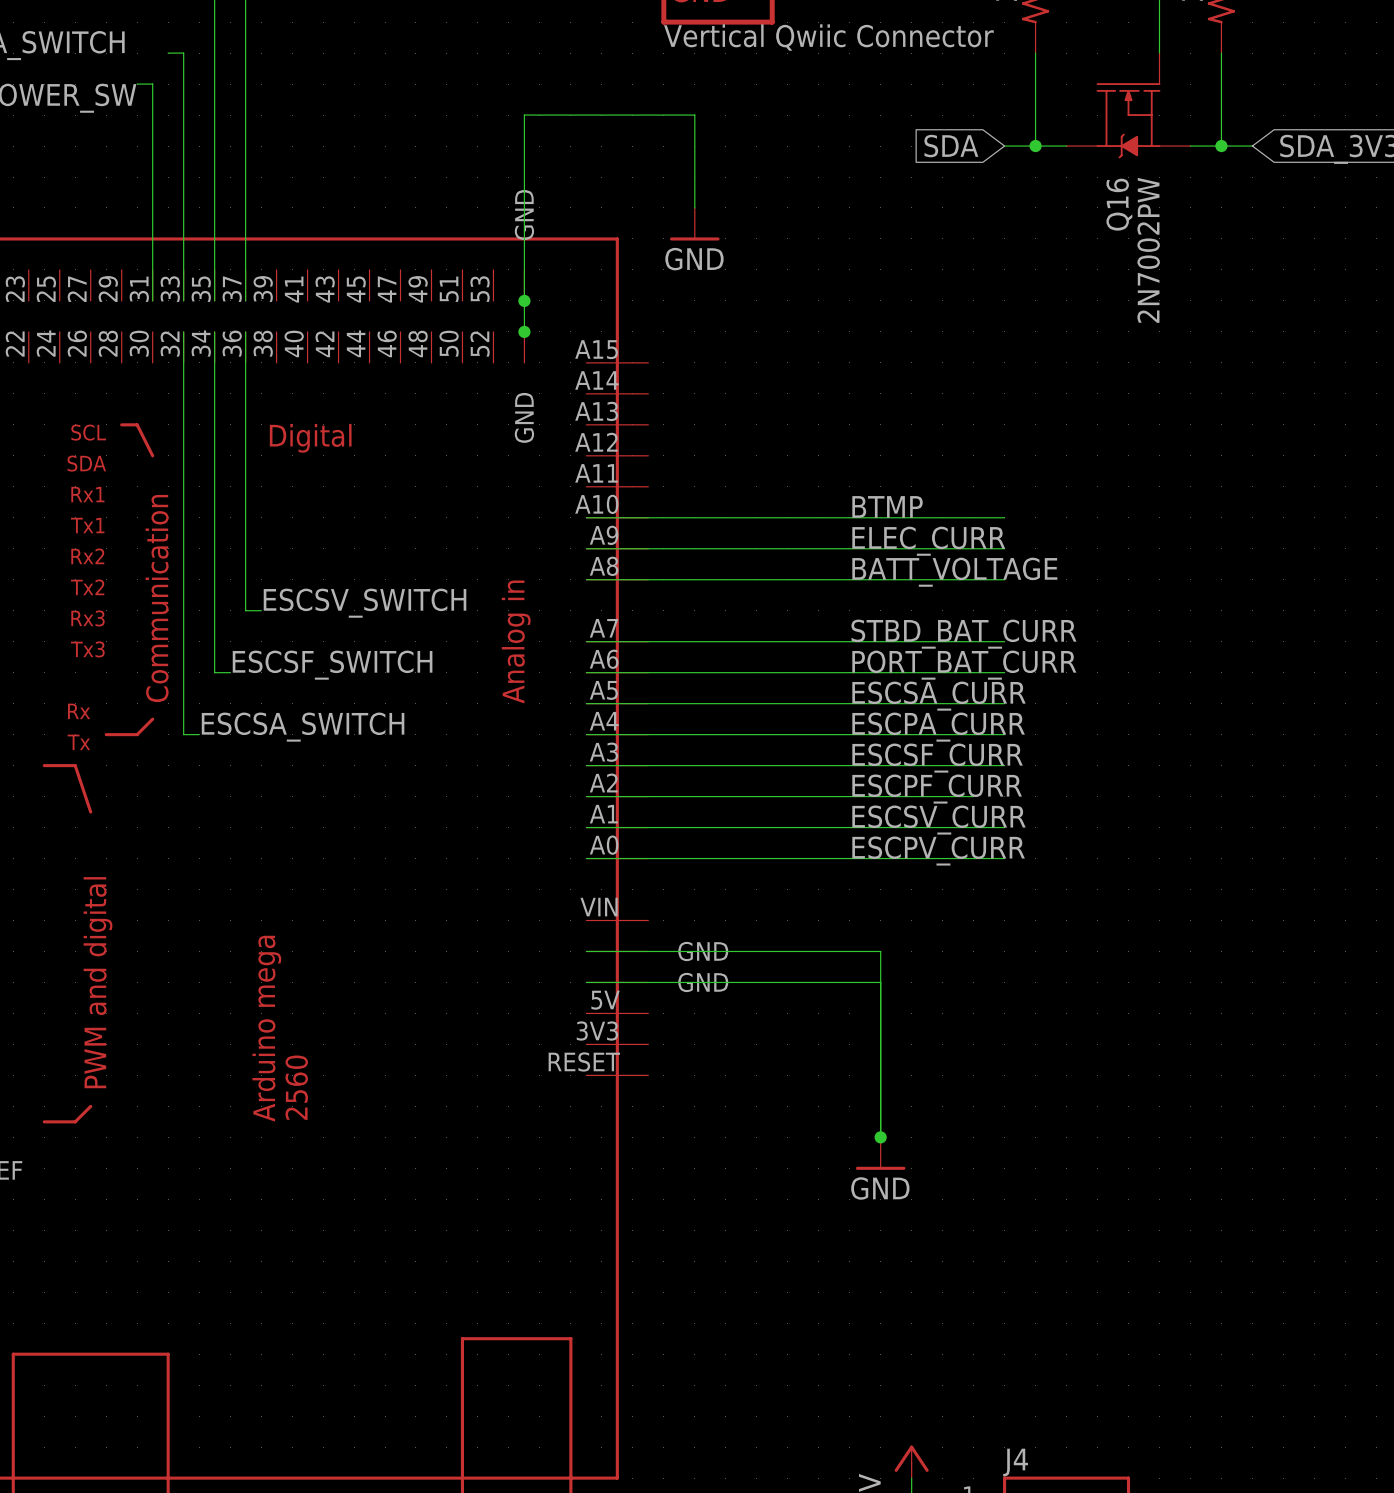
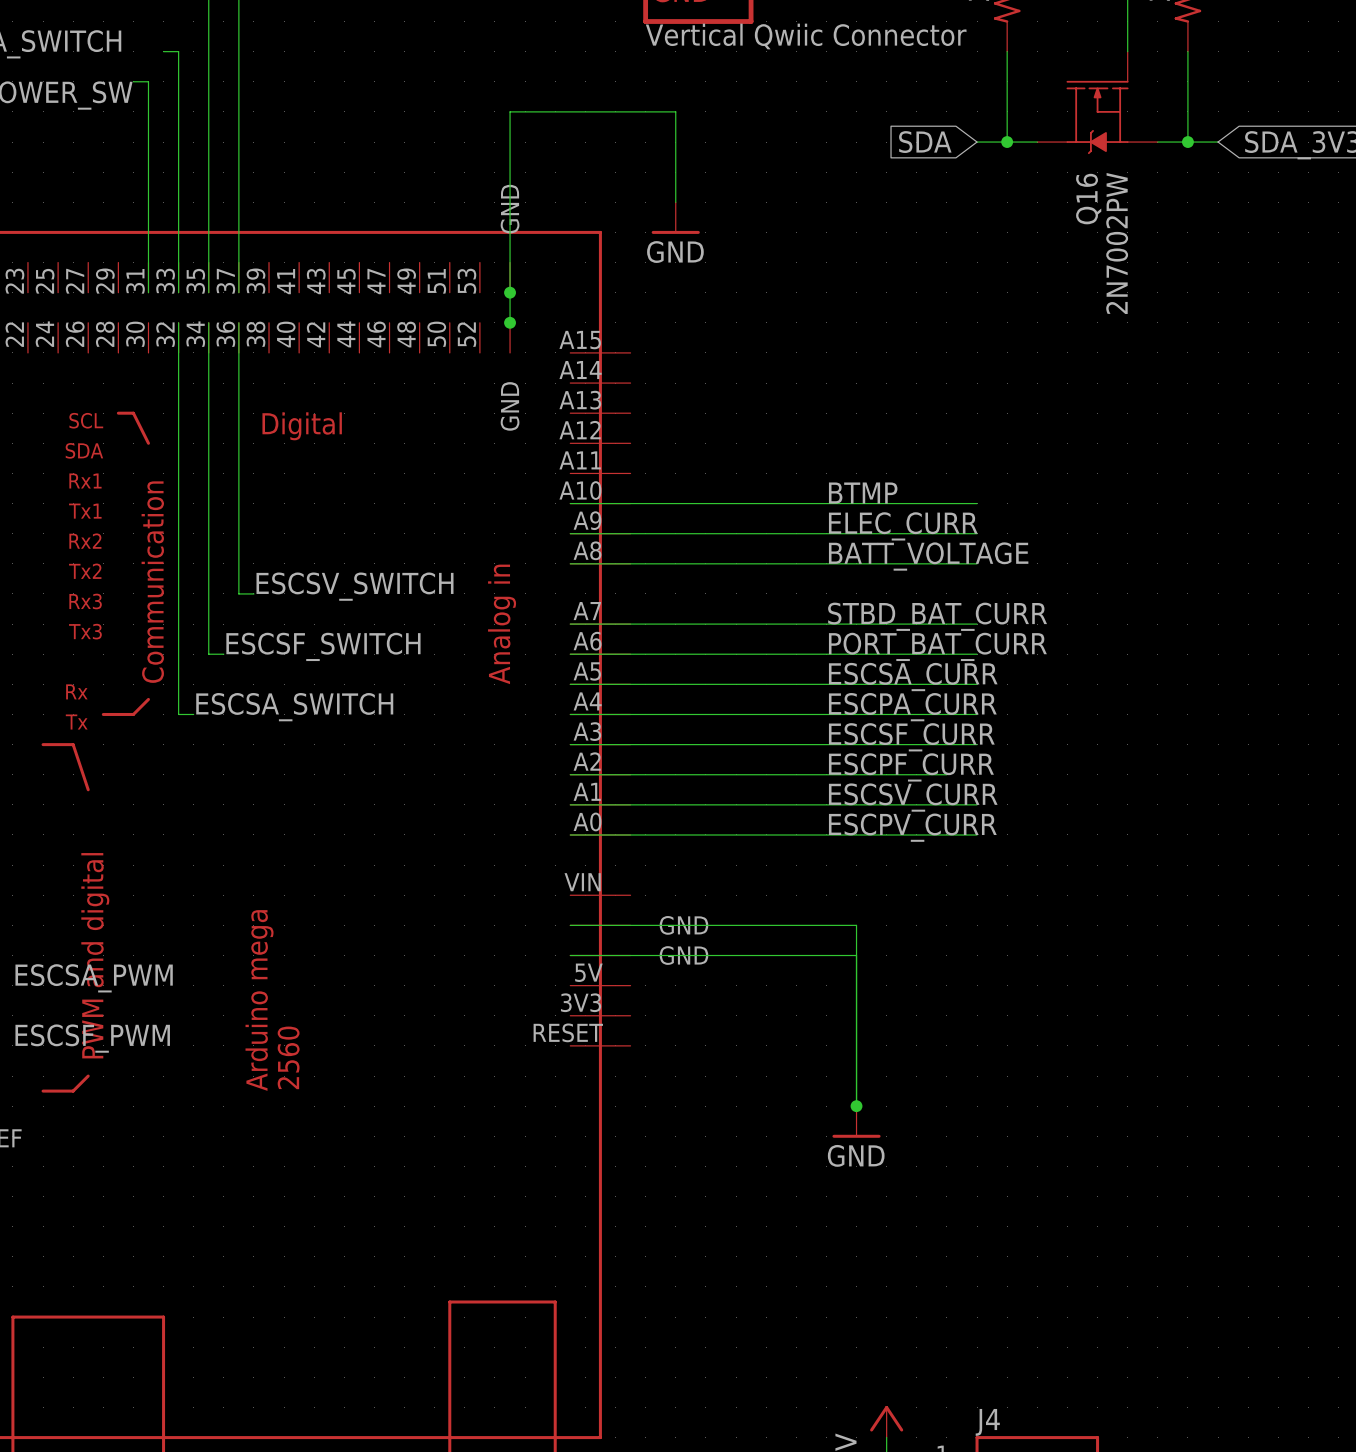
label: none -> ESCSA_PWM (94, 978)
label: none -> ESCSF_PWM (92, 1038)

